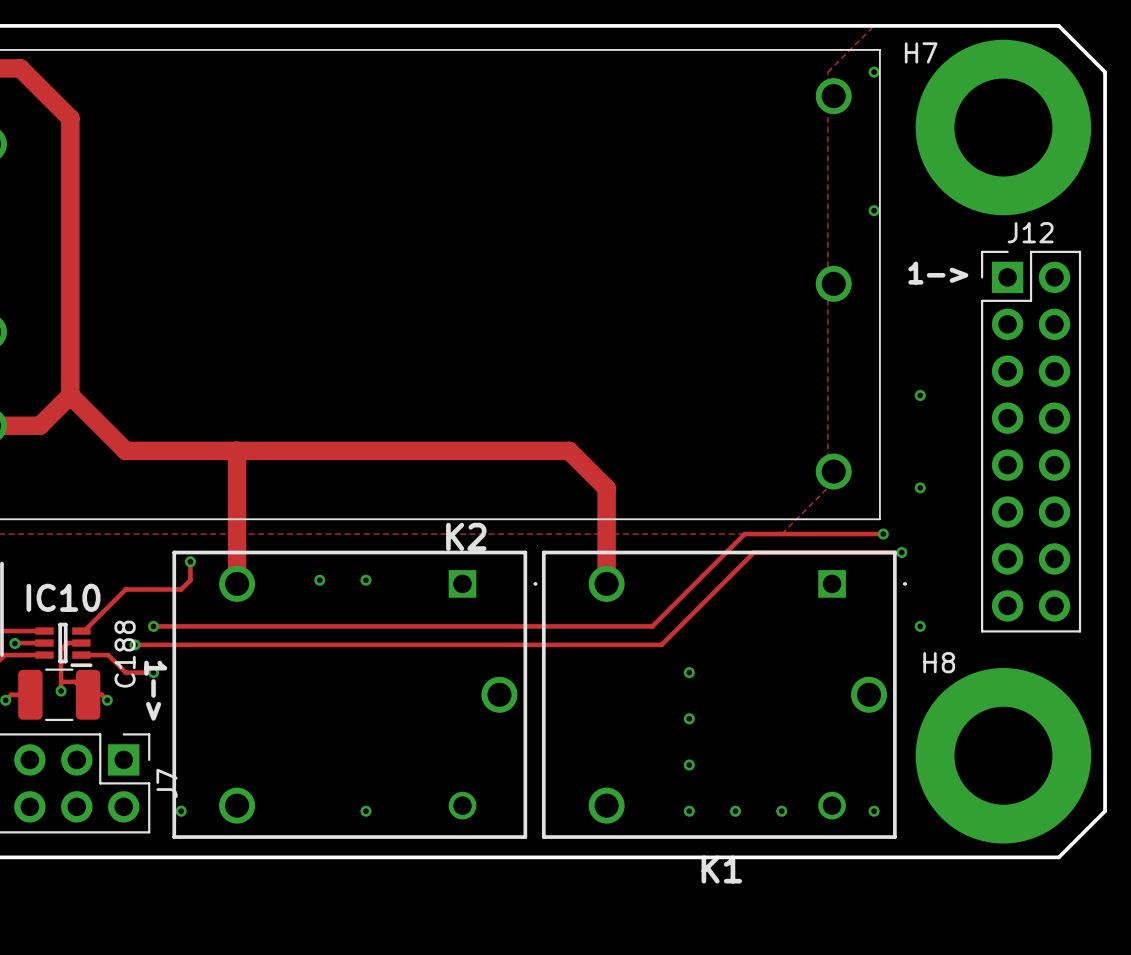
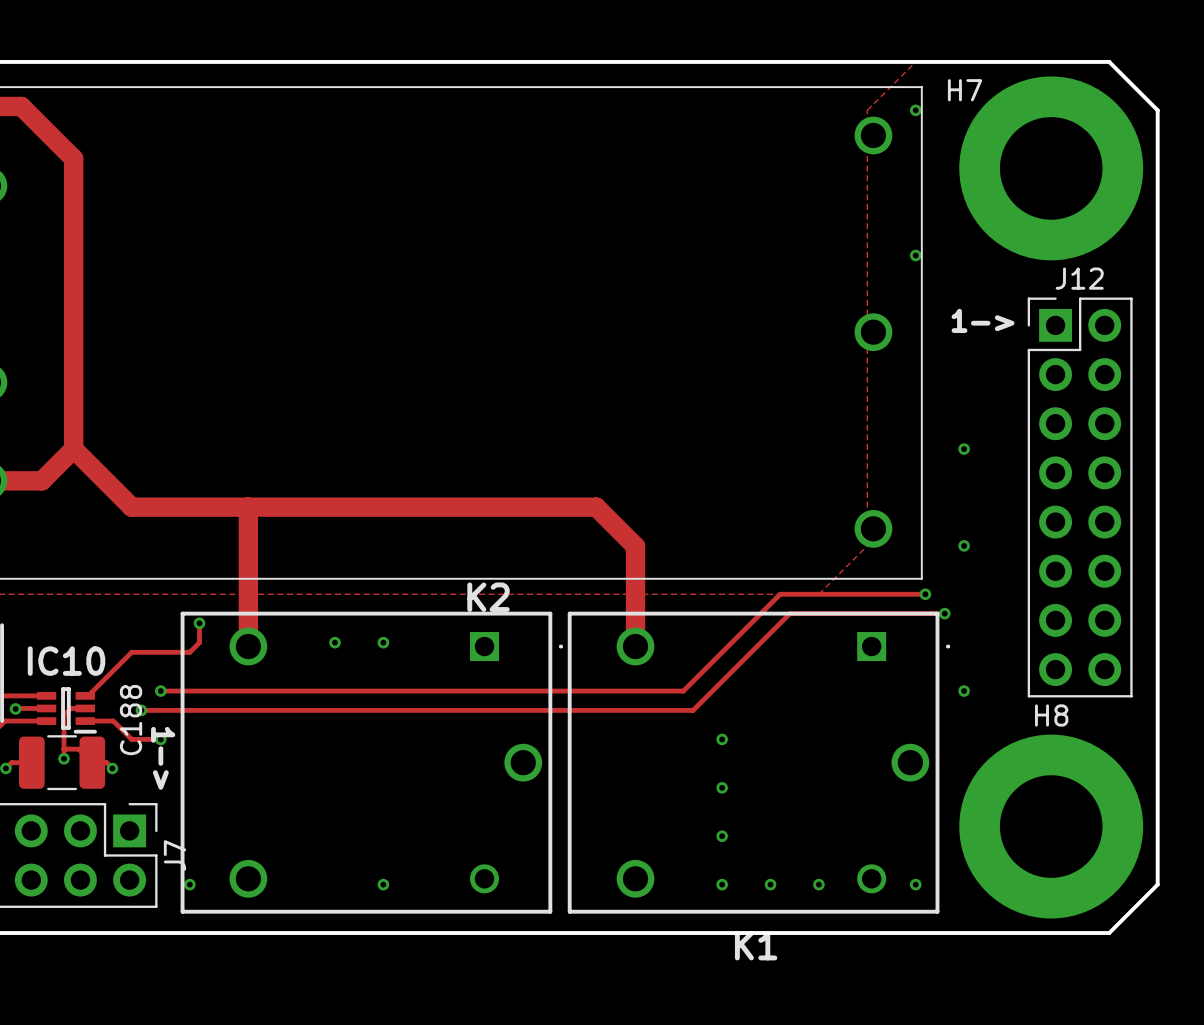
H8 name position: H8 (939, 662) -> H8 (1051, 715)

